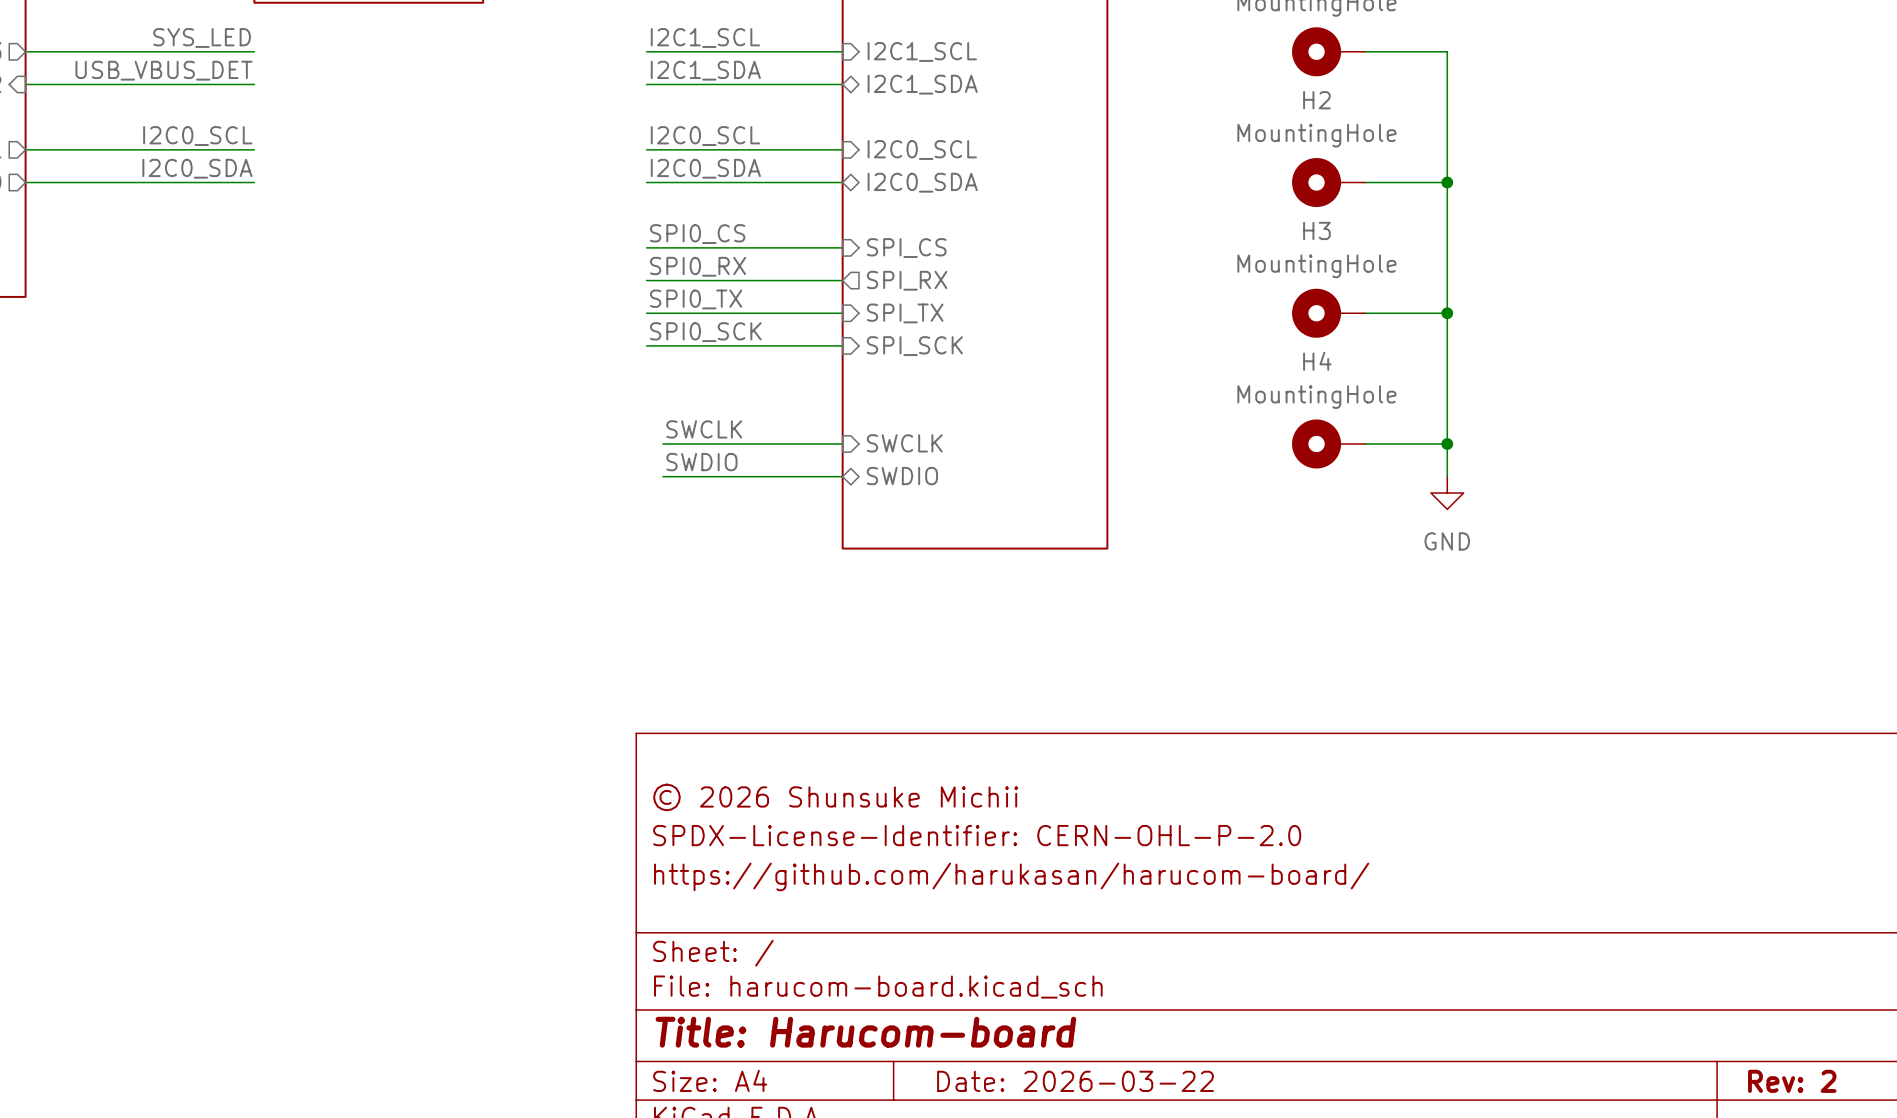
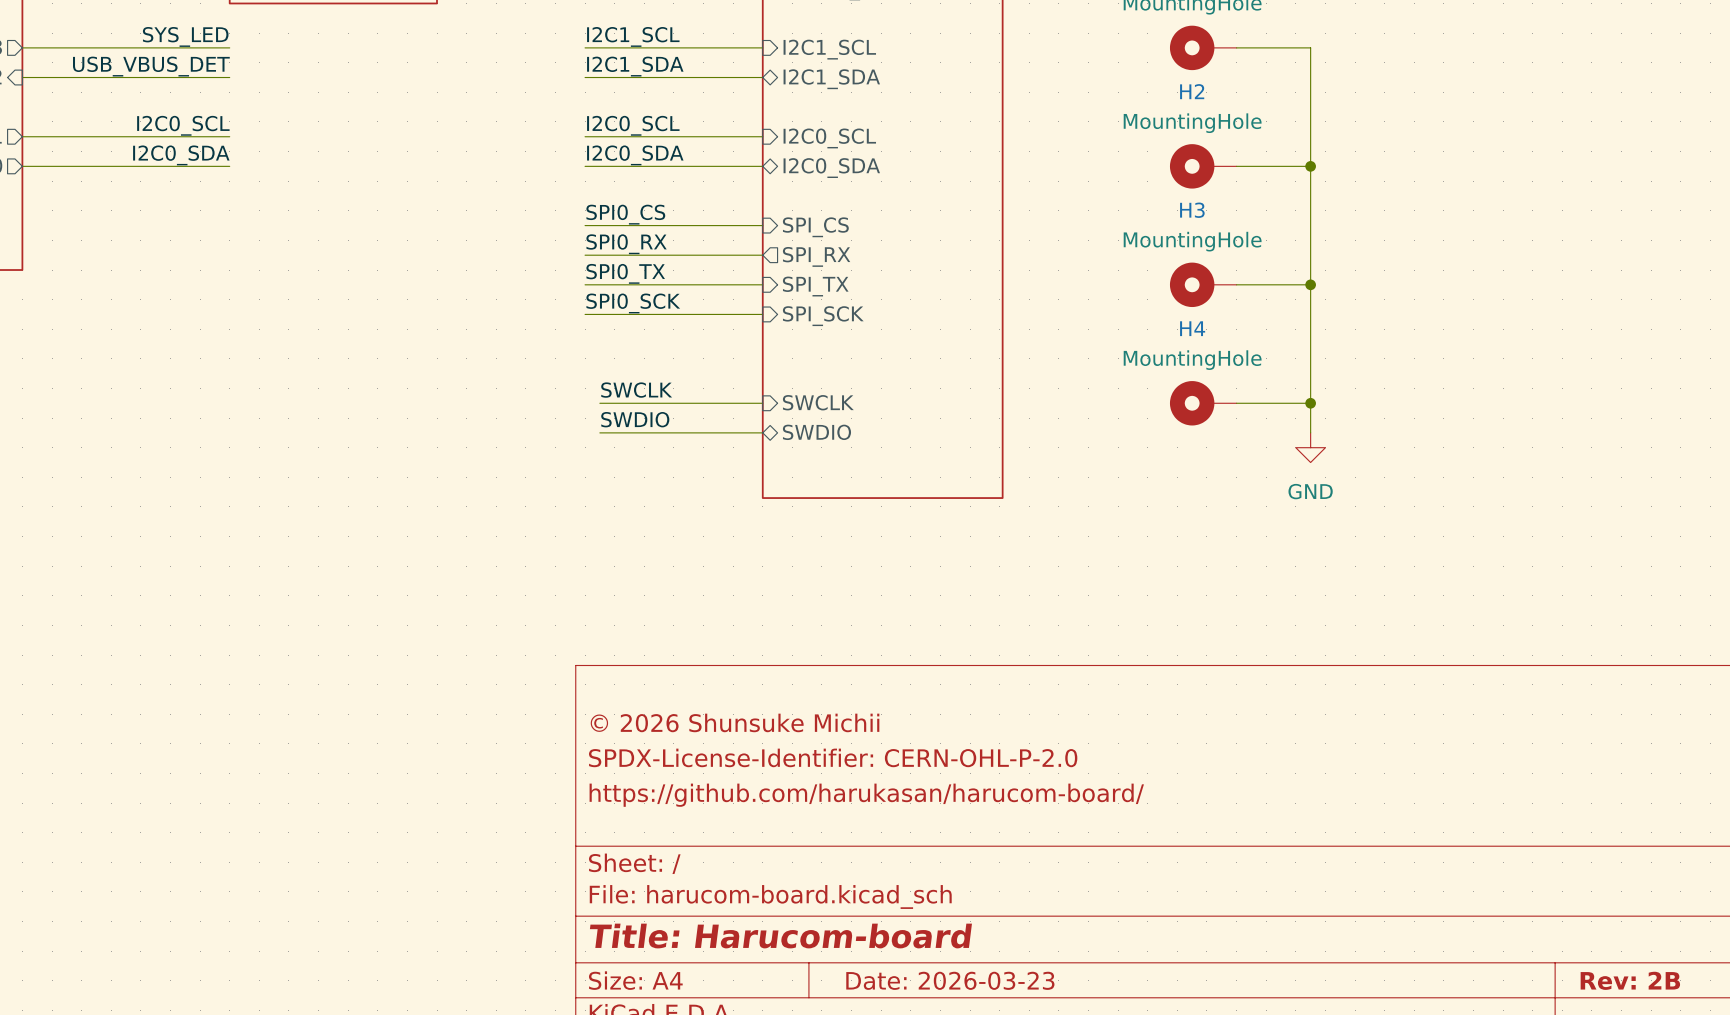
title block: Date: 2026-03-22 (1075, 1081) -> Date: 2026-03-23 (950, 980)
title block: Rev: 2 (1792, 1081) -> Rev: 2B (1630, 980)

